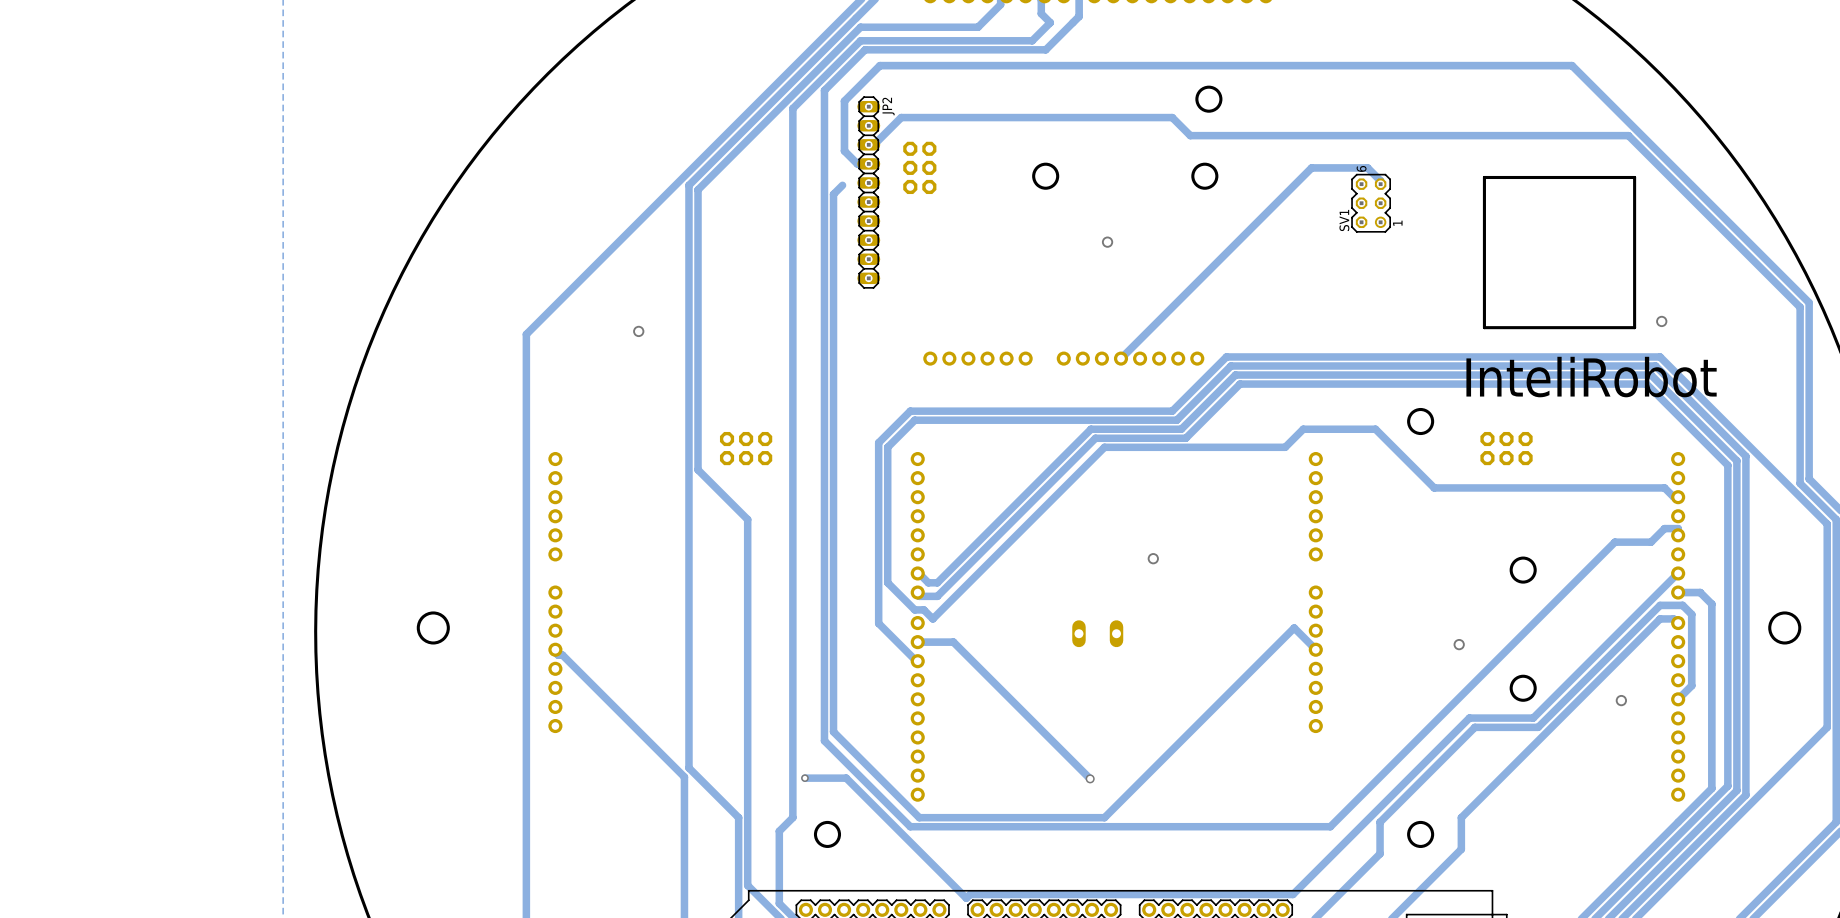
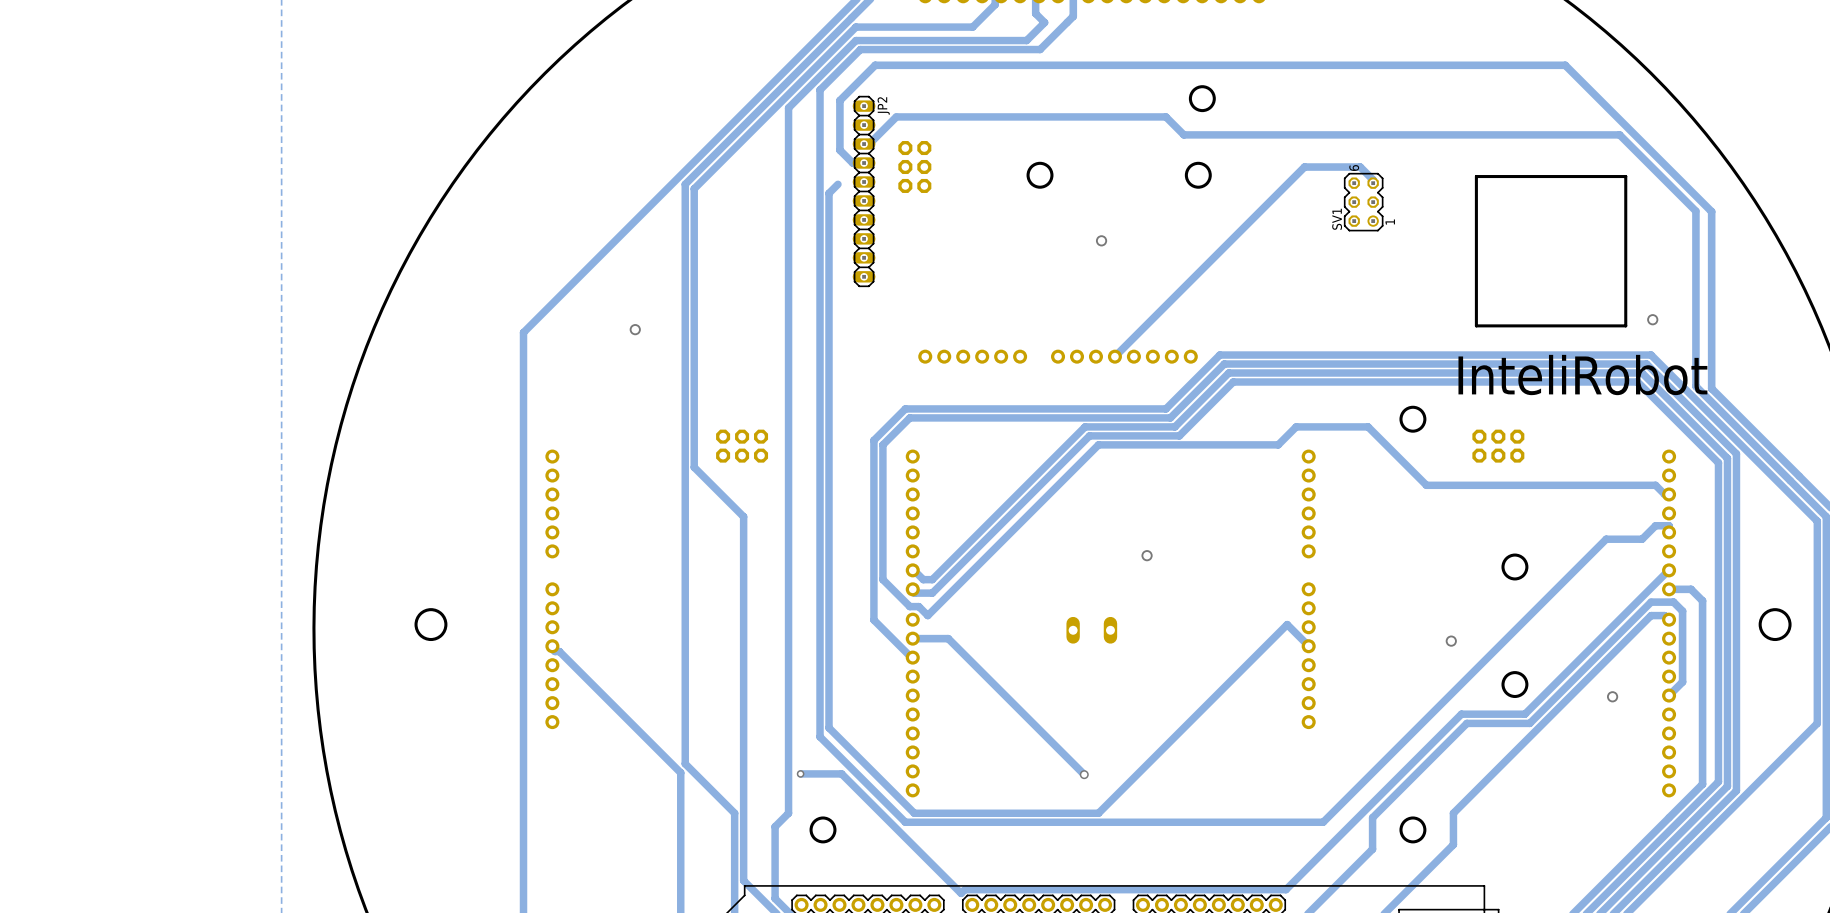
track: (1572, 65) (1809, 302) (1809, 478) -> (1563, 65) (1711, 211) (1711, 388) (1799, 476)
track: (1705, 212) (1800, 307) (1800, 483) -> (1695, 211) (1695, 386) (1790, 480)

